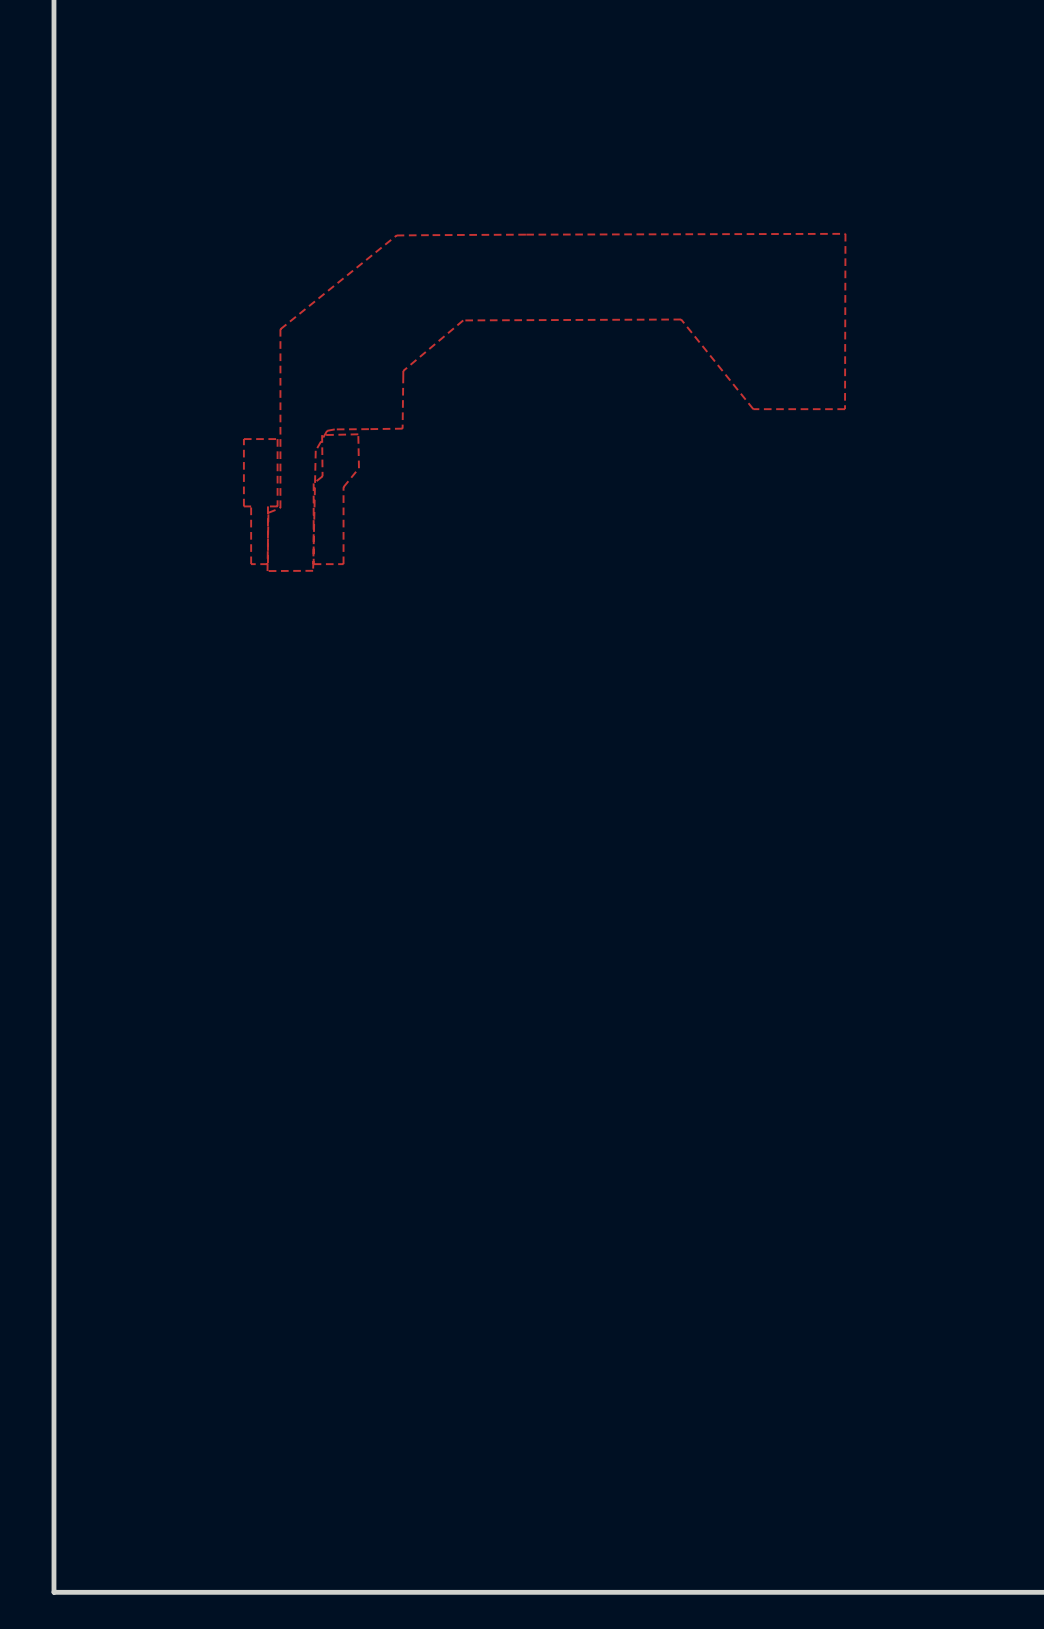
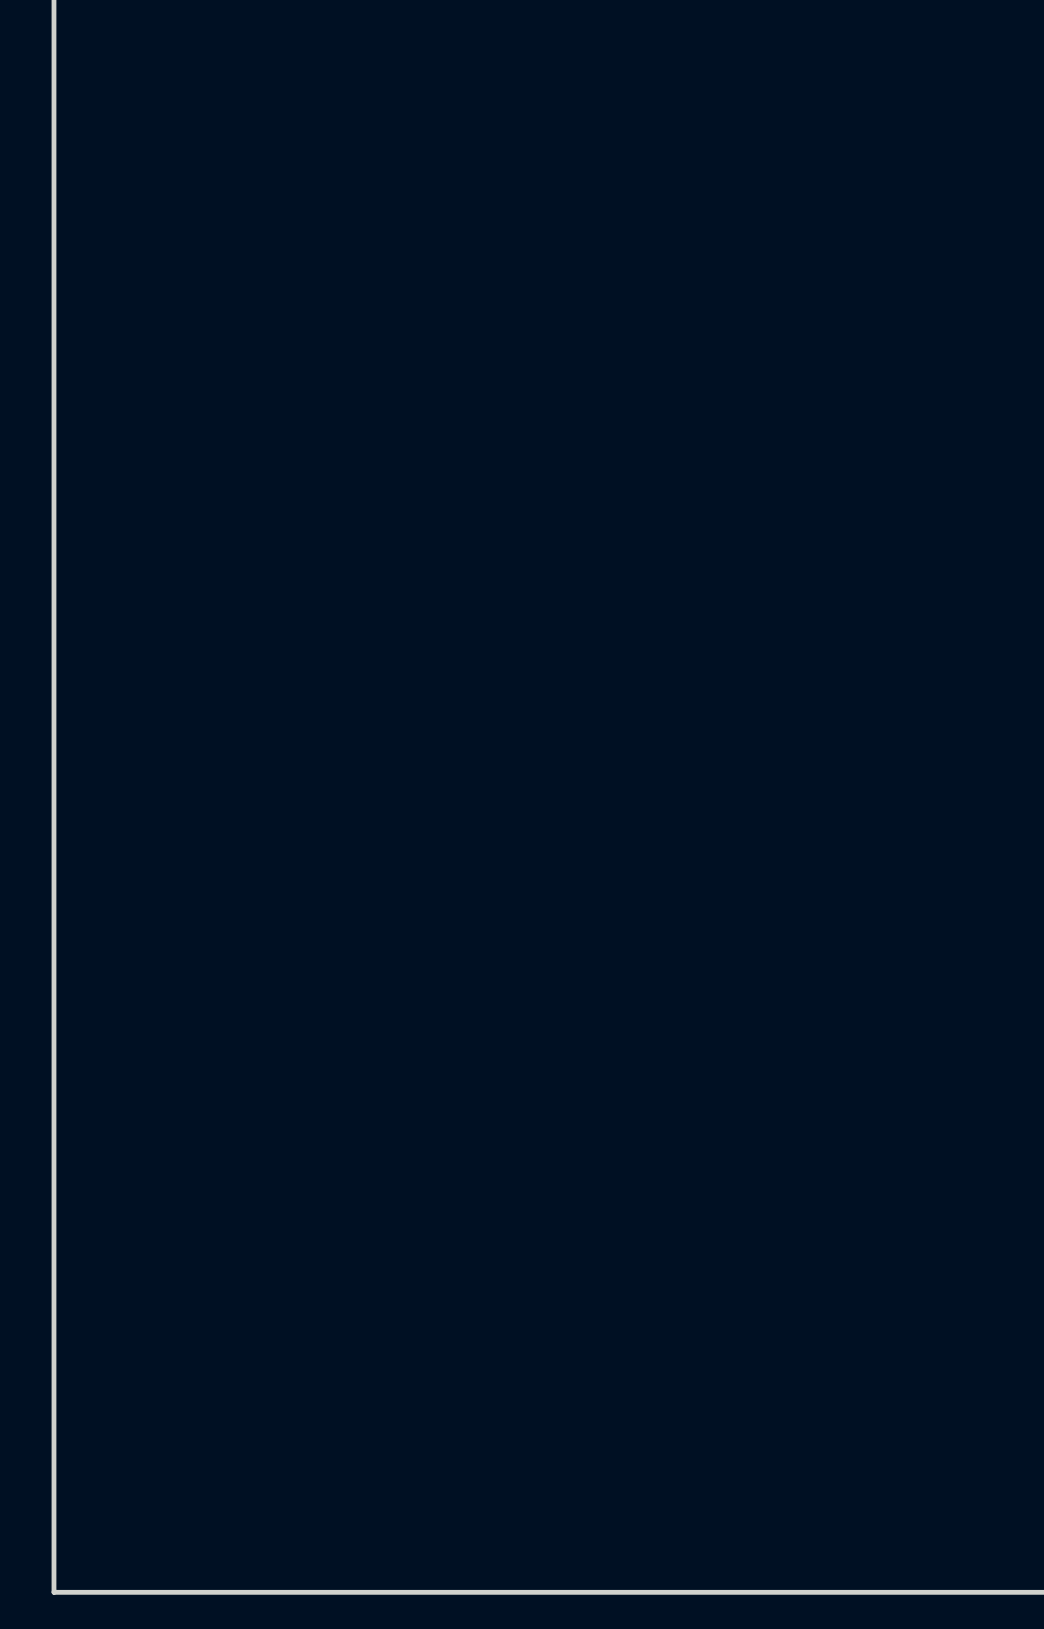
zone outline: (845, 233) (845, 409) (753, 409) (681, 319) (463, 320) (403, 370) (402, 428) (327, 430) (315, 450) (313, 570) (267, 571) (268, 512) (280, 508) (280, 329) (396, 235) (845, 233) -> none
zone outline: (358, 434) (358, 468) (343, 487) (343, 564) (313, 564) (313, 483) (322, 476) (322, 435) (358, 434) -> none
zone outline: (243, 439) (277, 439) (277, 506) (267, 506) (267, 564) (251, 564) (251, 506) (243, 506) (243, 439) -> none

